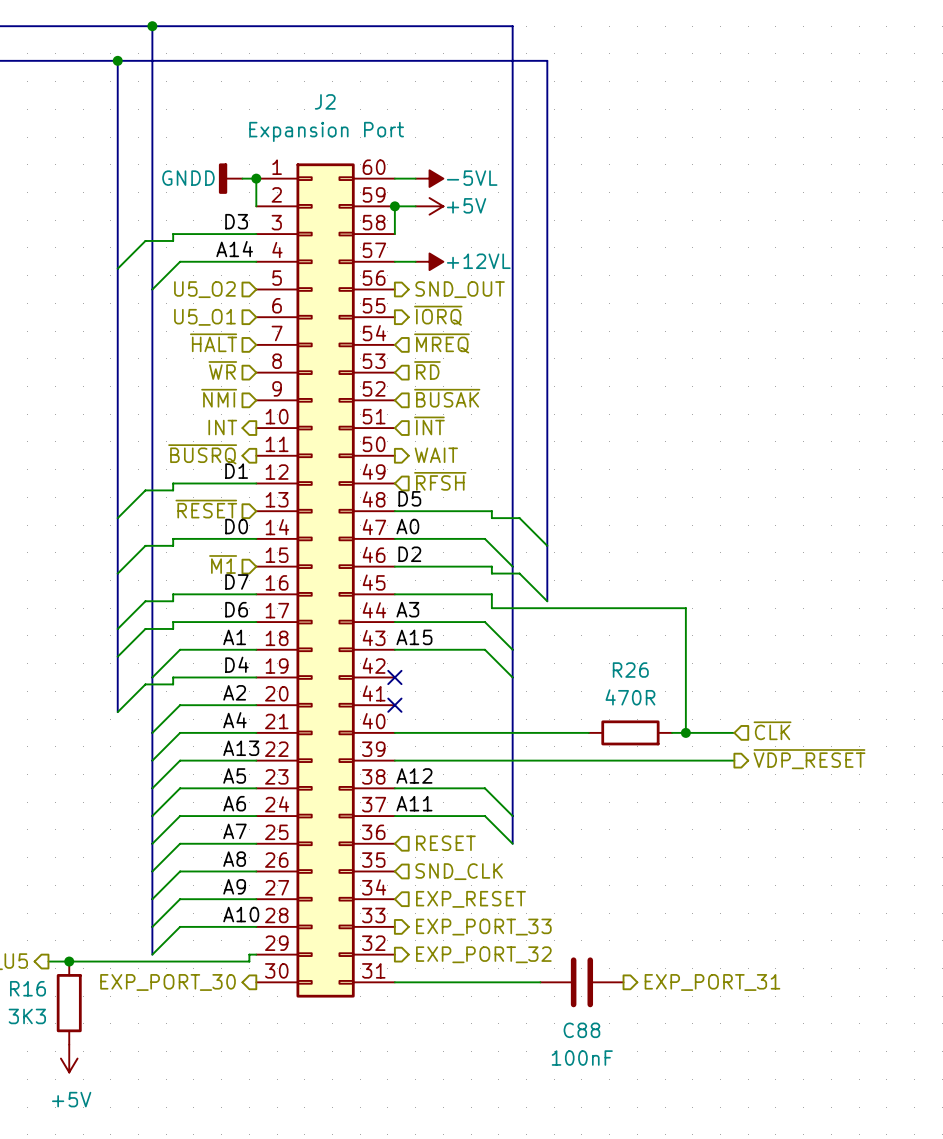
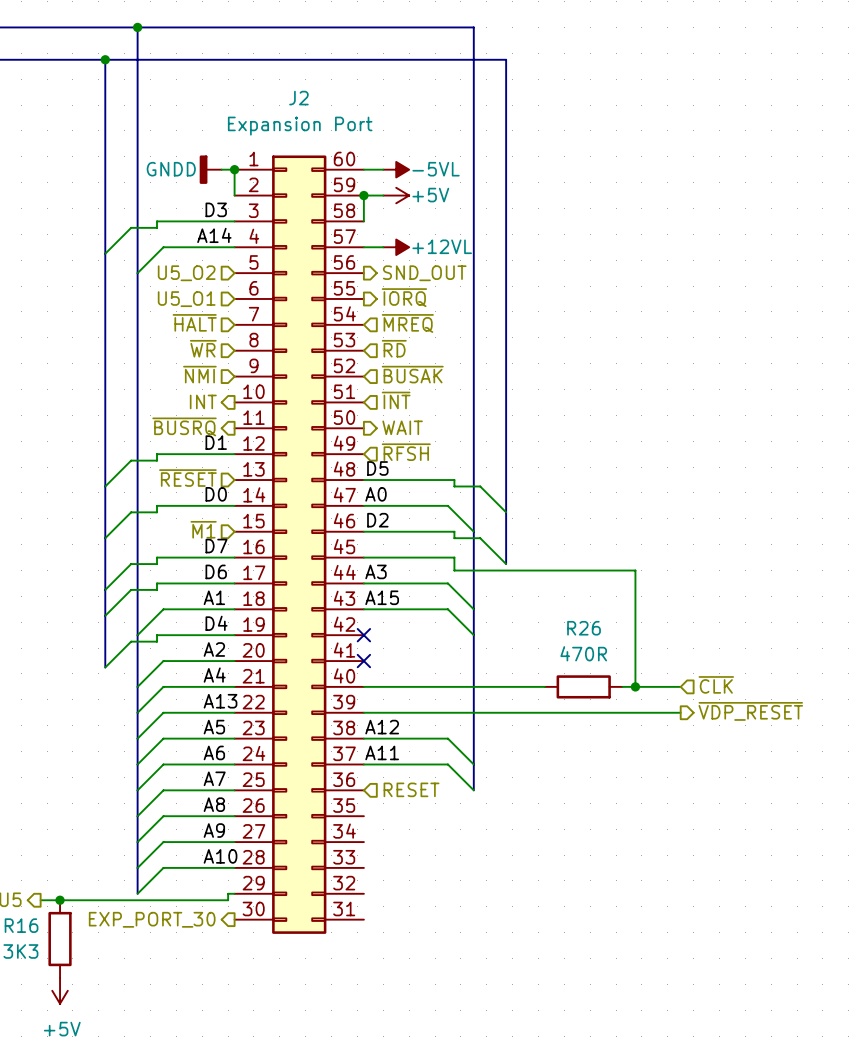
hierarchical label: SND_CLK (459, 871) -> none
hierarchical label: EXP_RESET (470, 899) -> none
hierarchical label: EXP_PORT_33 (483, 927) -> none
hierarchical label: EXP_PORT_32 (483, 954) -> none
wire: (394, 982) (540, 982) -> none
C88: 100nF (581, 982) -> none
hierarchical label: EXP_PORT_31 (712, 982) -> none

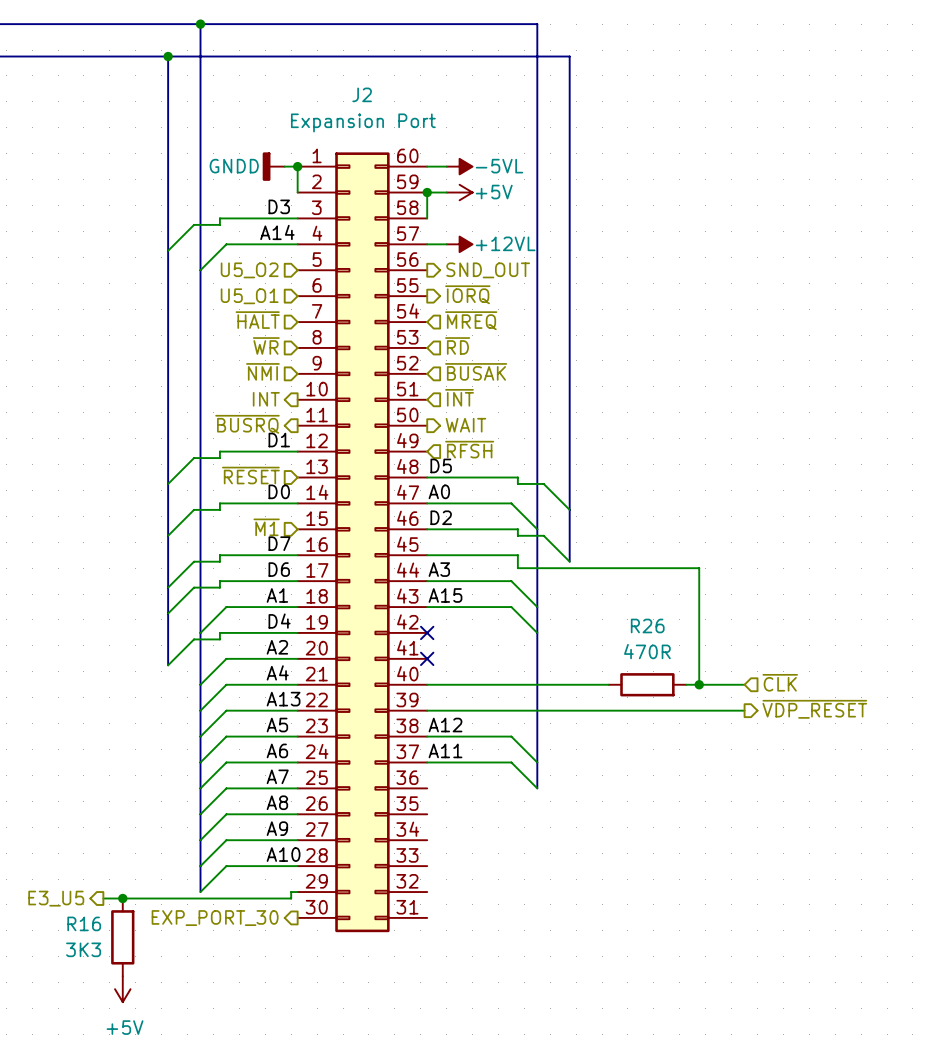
hierarchical label: RESET (411, 789) -> none

